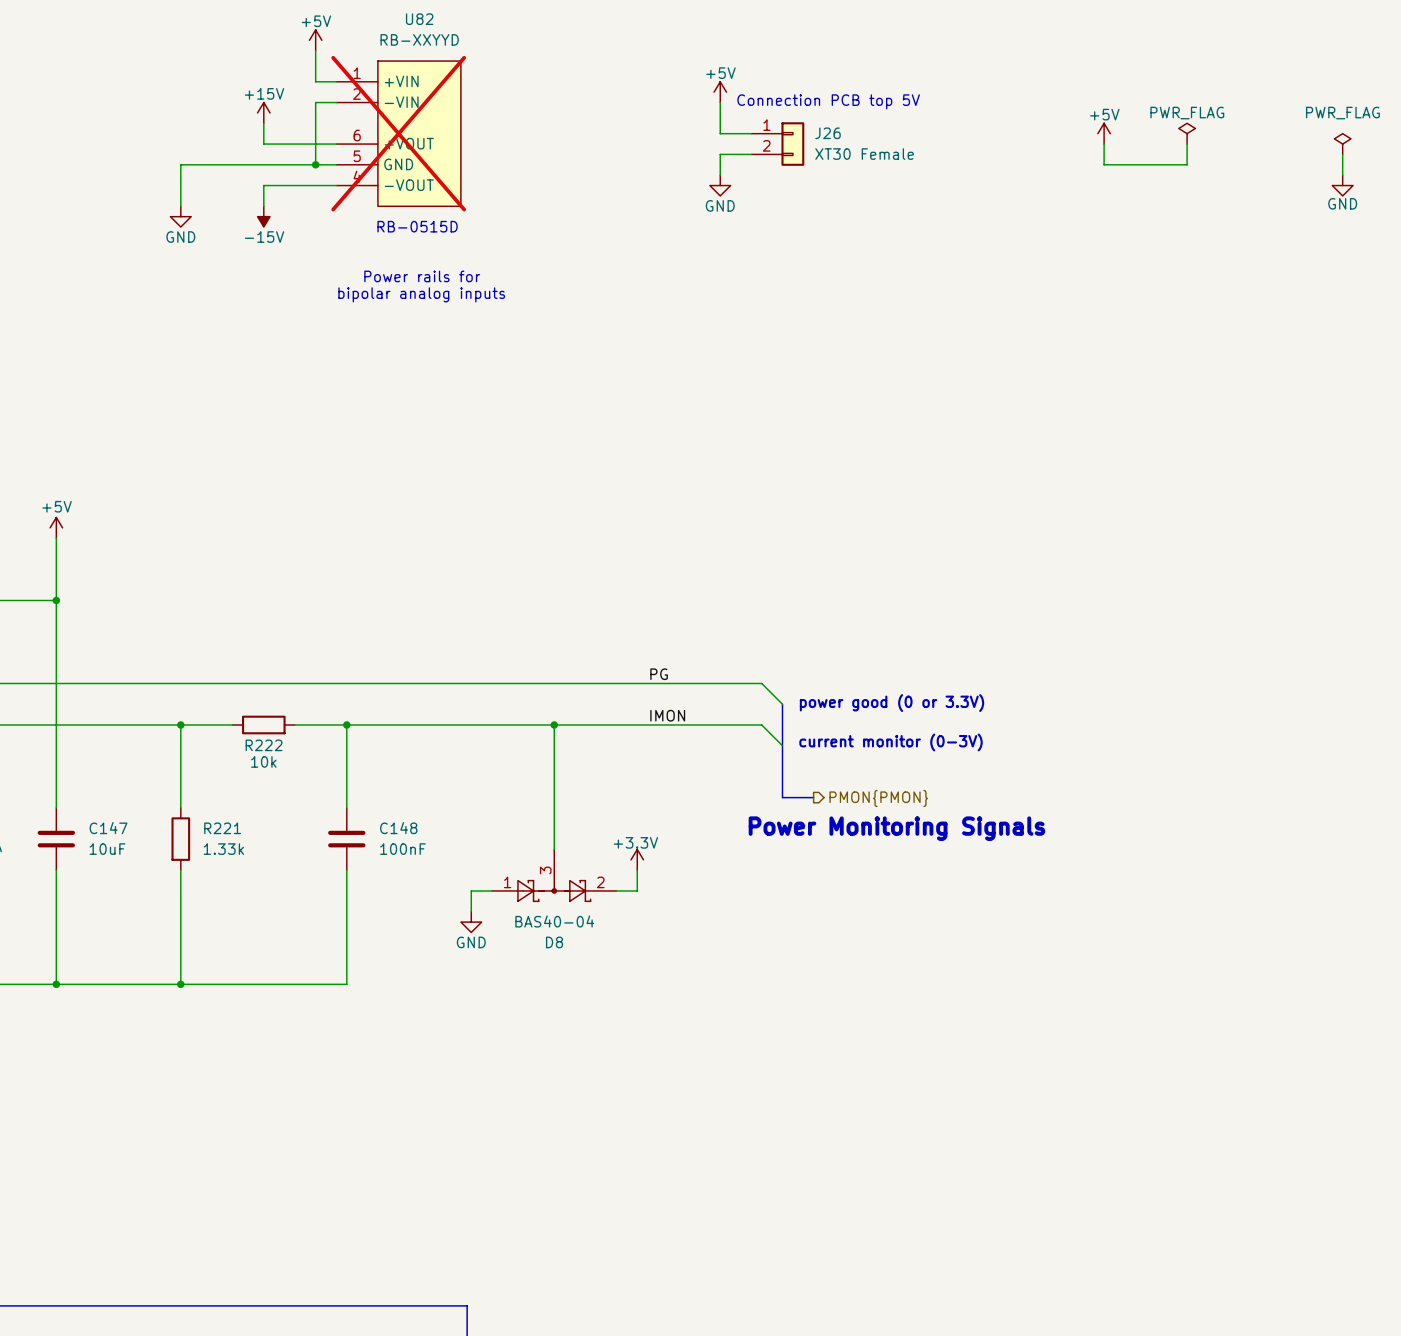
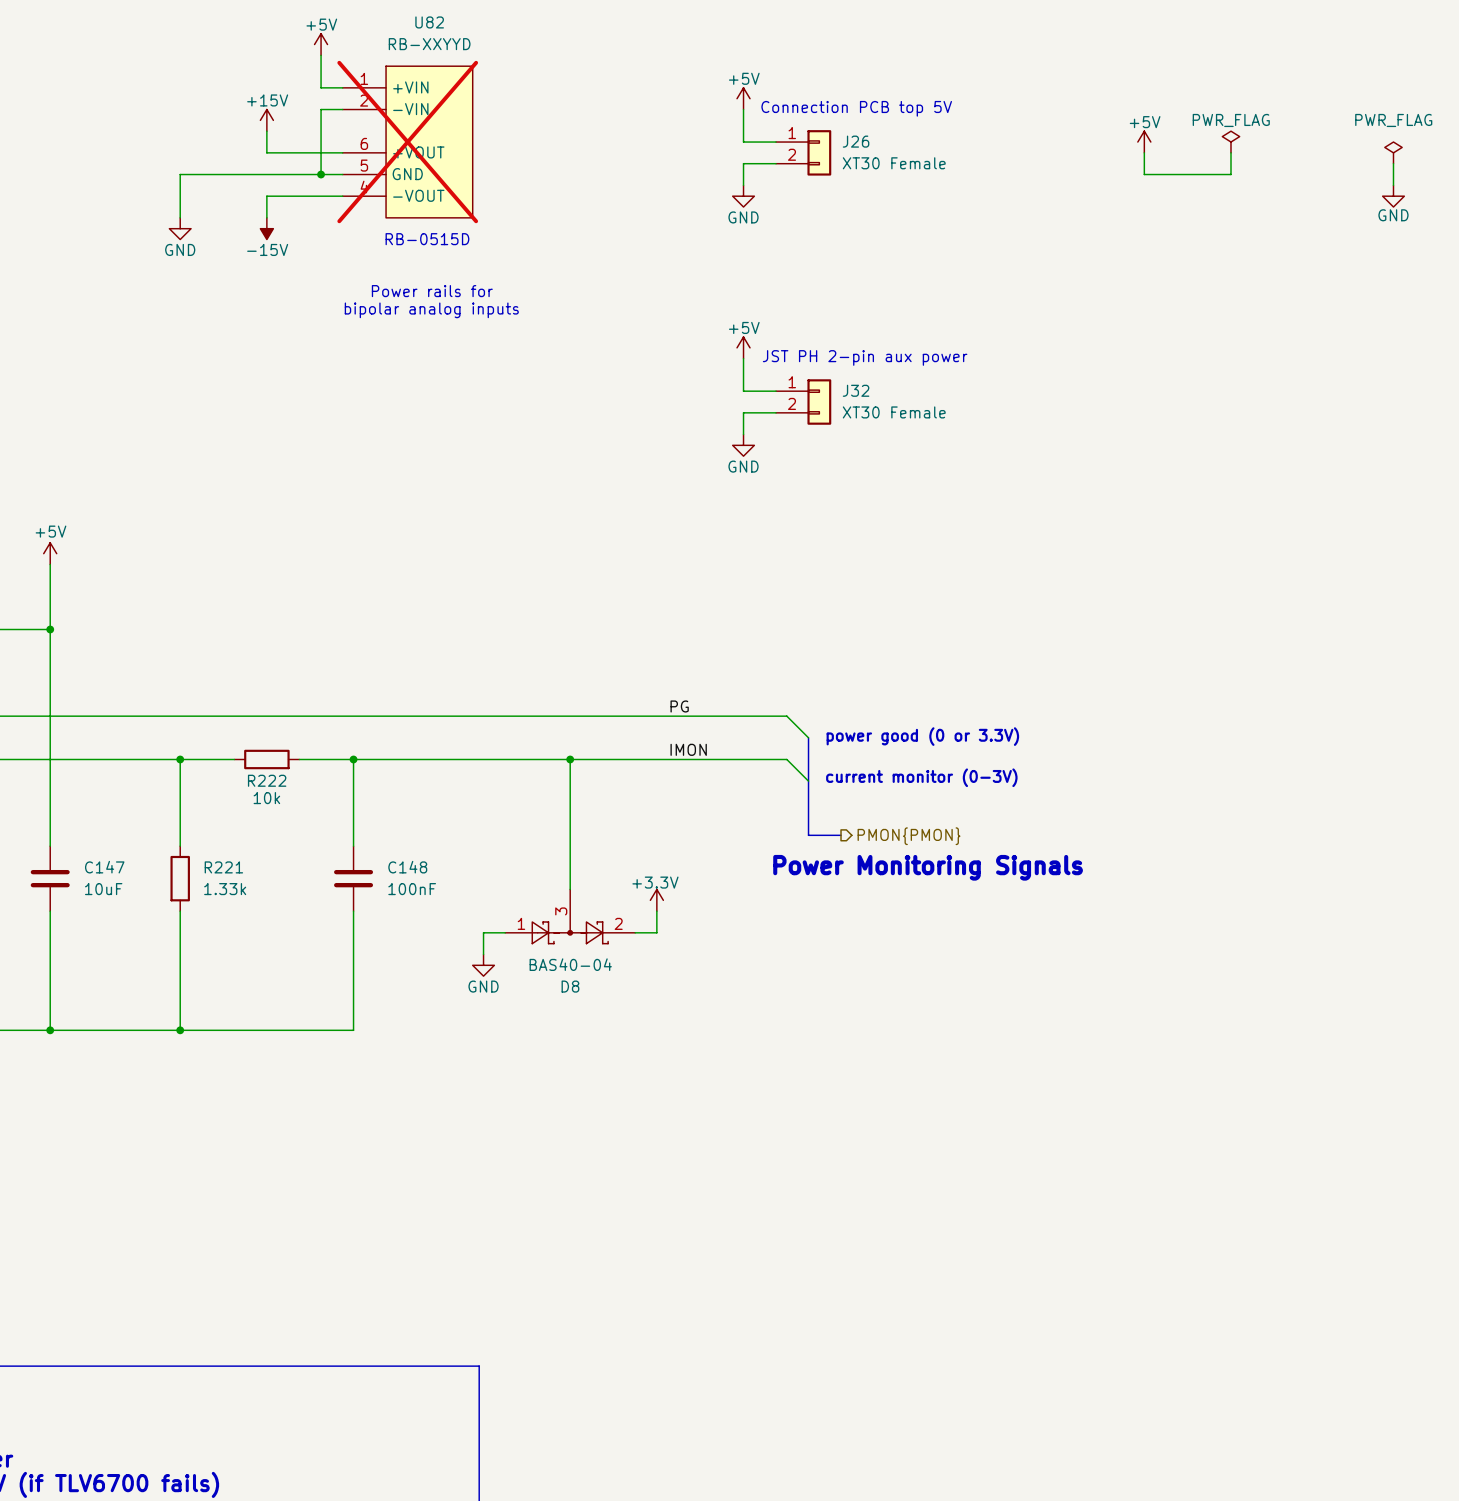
power symbol: none -> +5V (743, 347)
text: none -> JST PH 2-pin aux power (865, 357)
wire: none -> (743, 358) (743, 391) (776, 391)
J32: none -> XT30 Female (803, 402)
wire: none -> (776, 412) (743, 412) (743, 434)
power symbol: none -> GND (743, 445)

